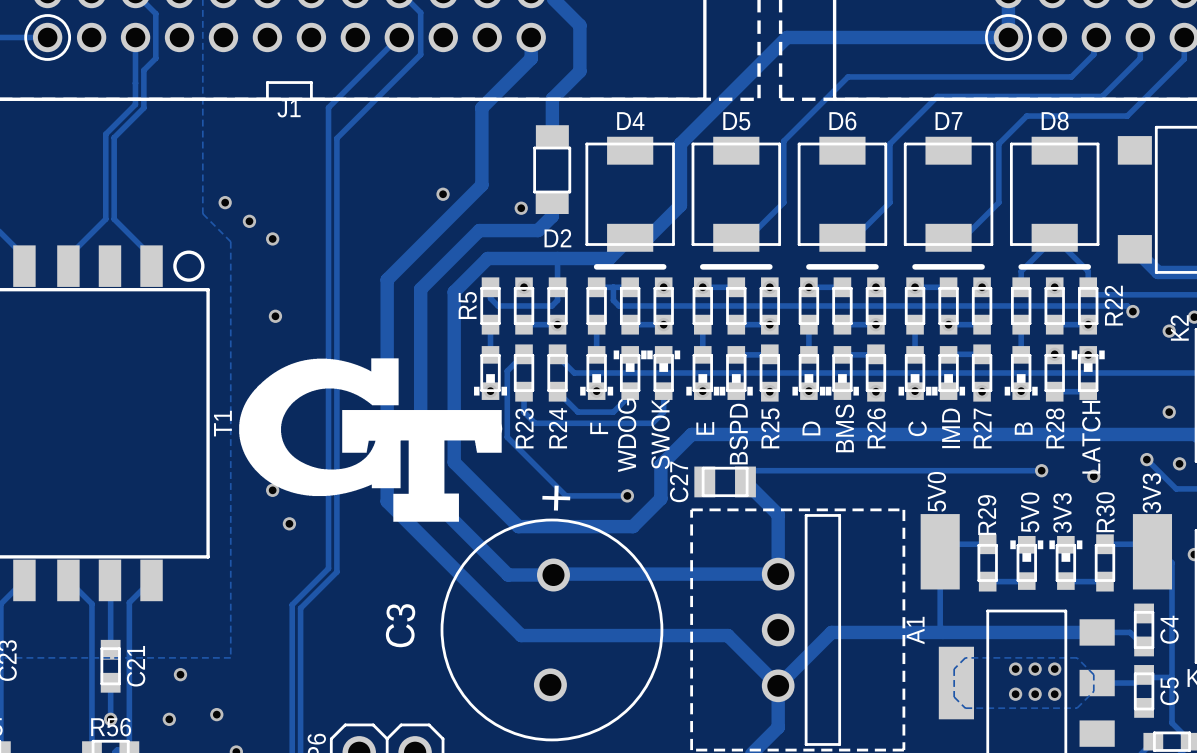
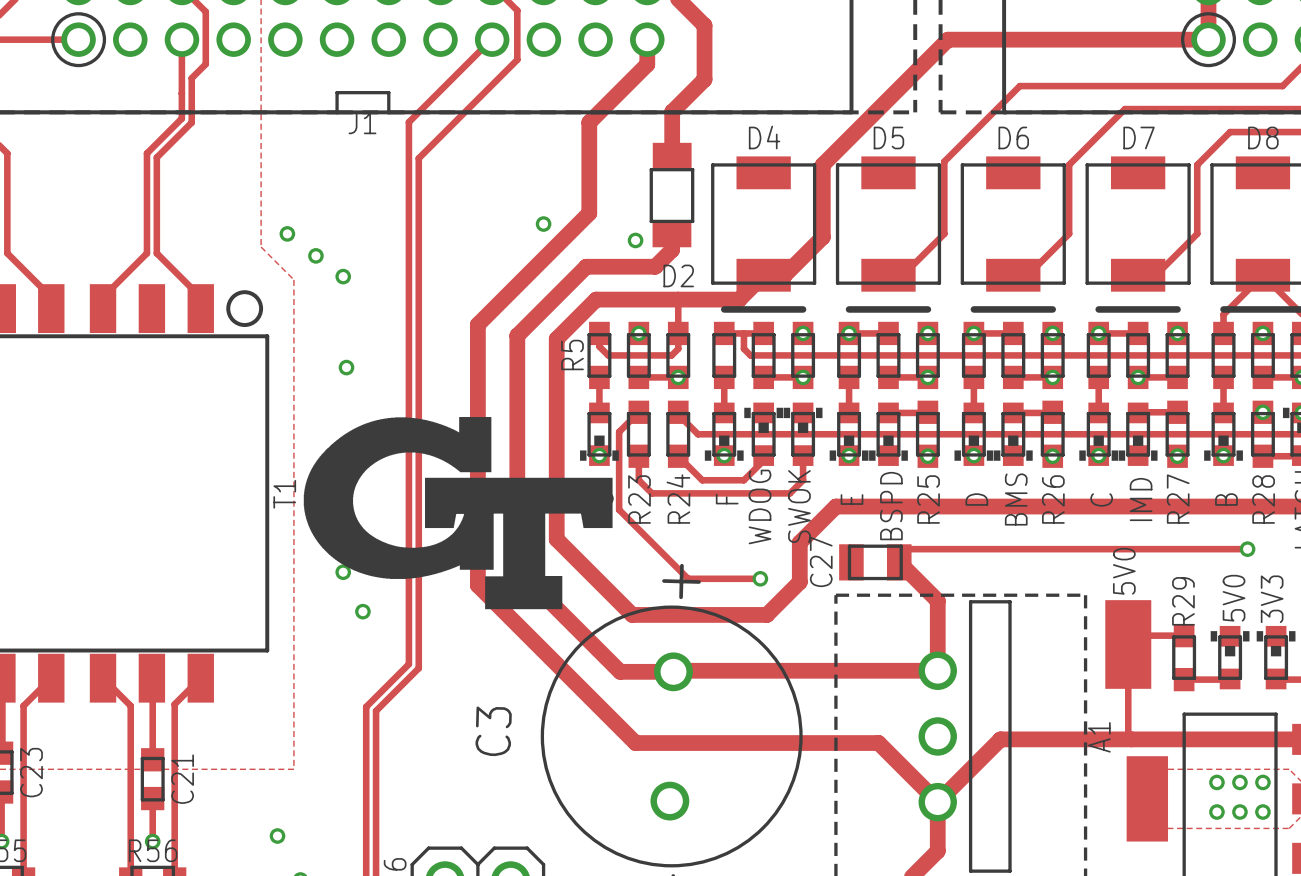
via: (180, 674) -> none
via: (169, 719) -> none

